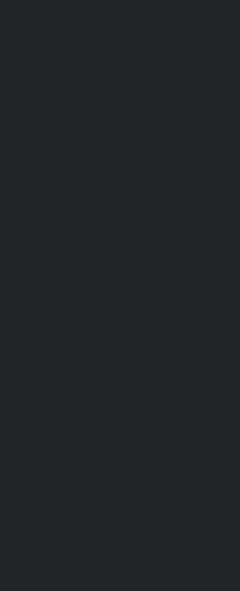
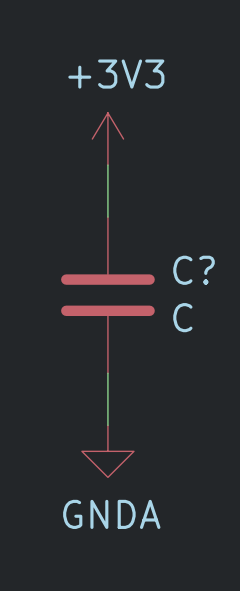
power symbol: none -> +3V3 (107, 139)
wire: none -> (107, 165) (107, 217)
C?: none -> C (107, 295)
wire: none -> (107, 373) (107, 425)
power symbol: none -> GNDA (107, 451)

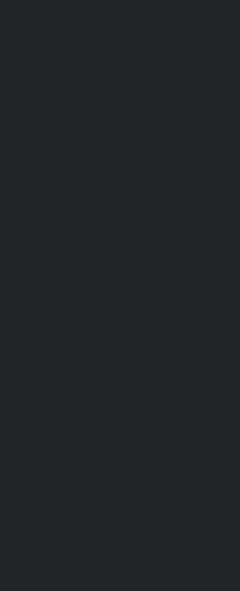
power symbol: +3V3 (107, 139) -> none
wire: (107, 165) (107, 217) -> none
C?: C (107, 295) -> none
wire: (107, 373) (107, 425) -> none
power symbol: GNDA (107, 451) -> none

